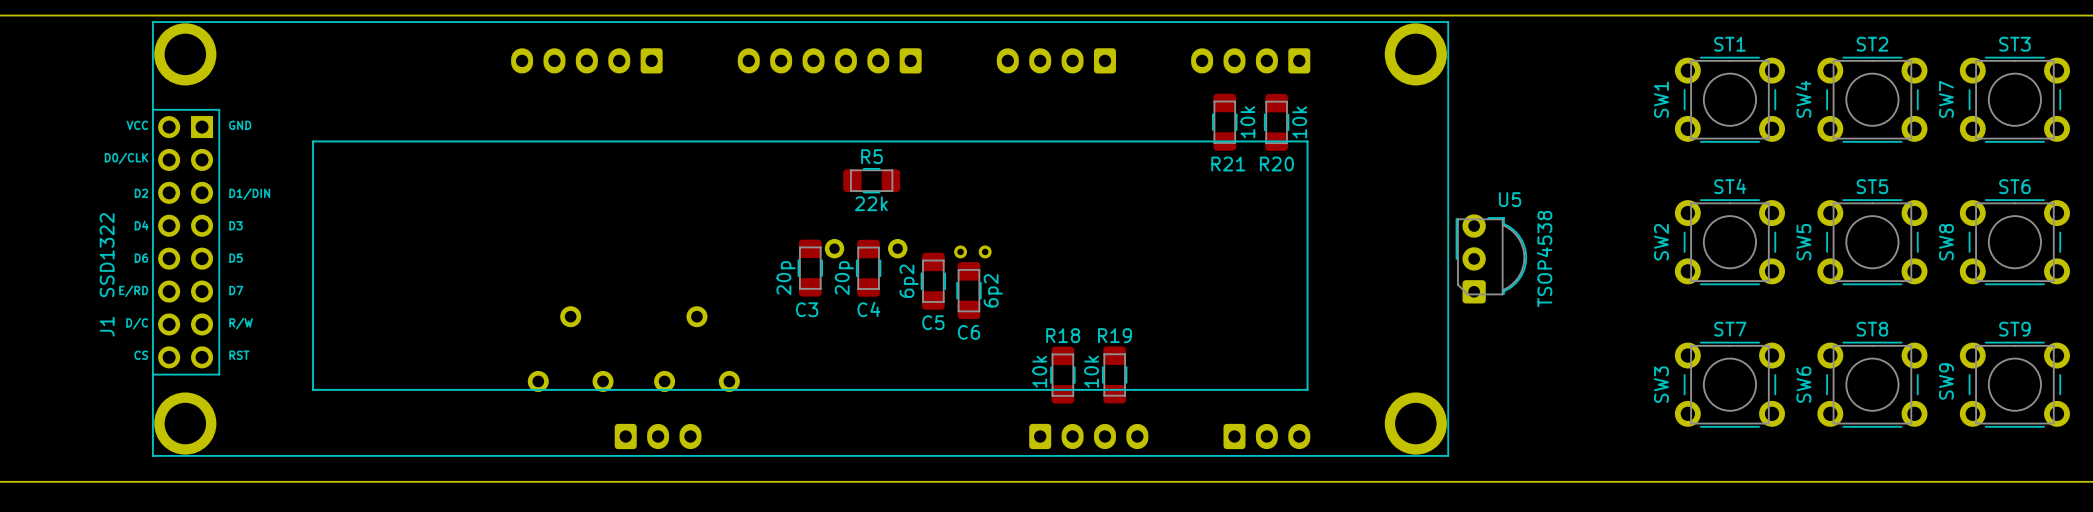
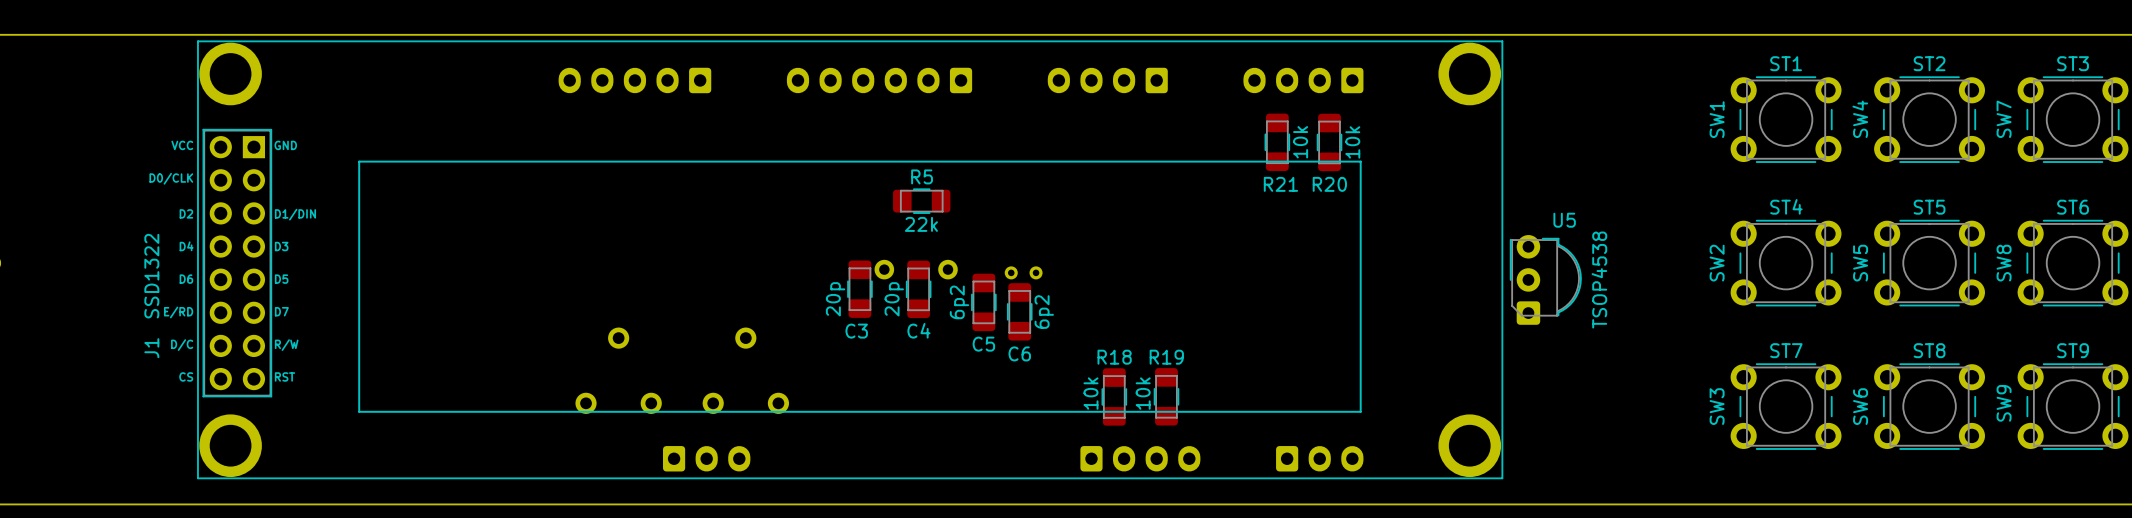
J1 footprint: [152, 21, 1450, 457] -> [197, 40, 1504, 480]

